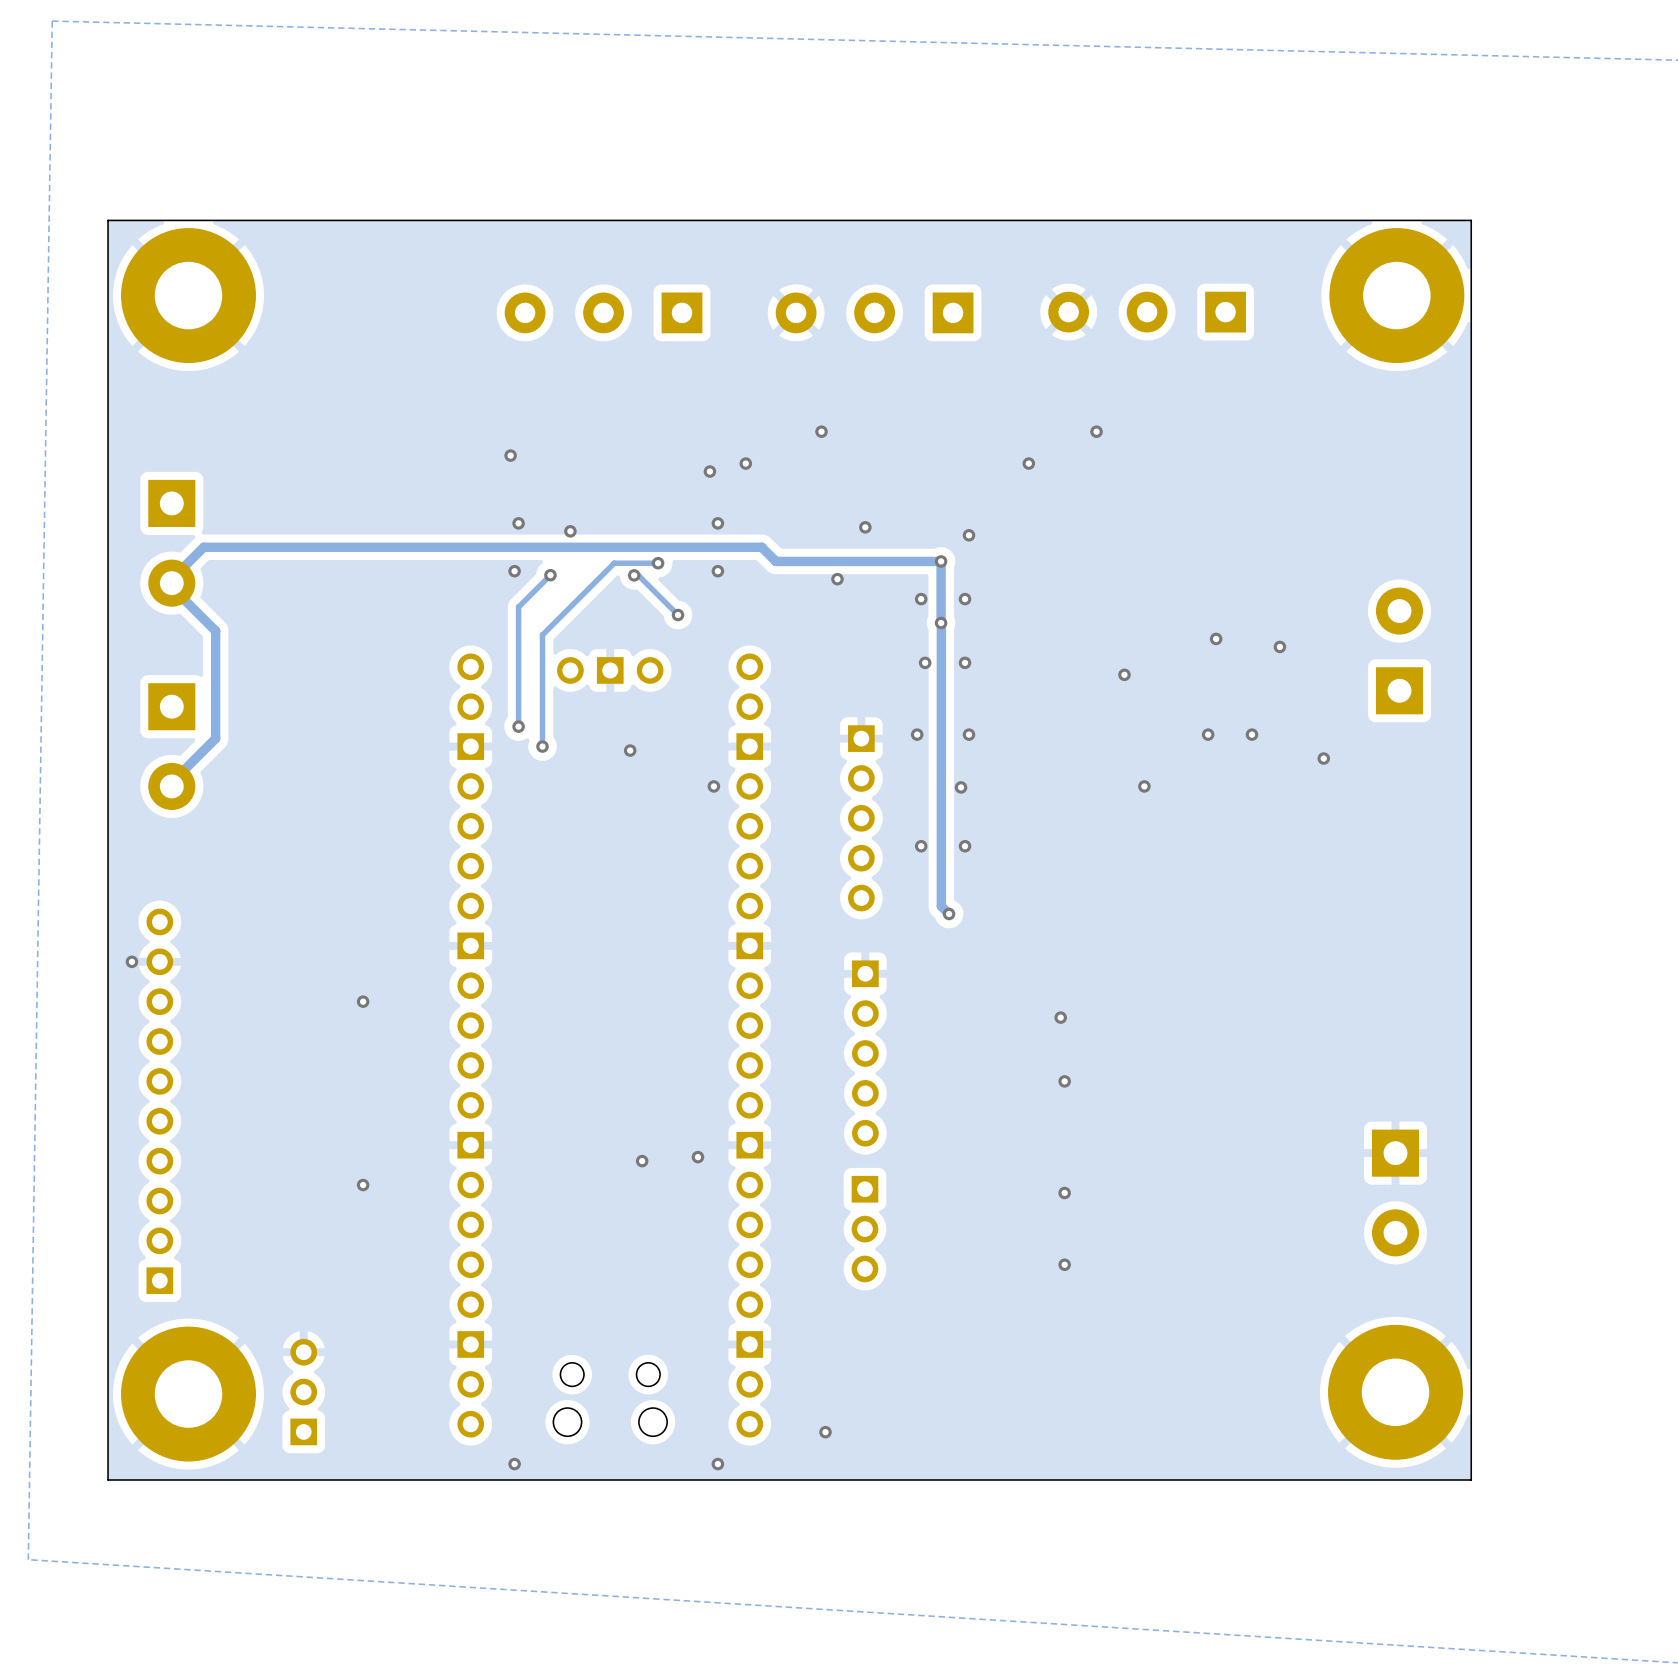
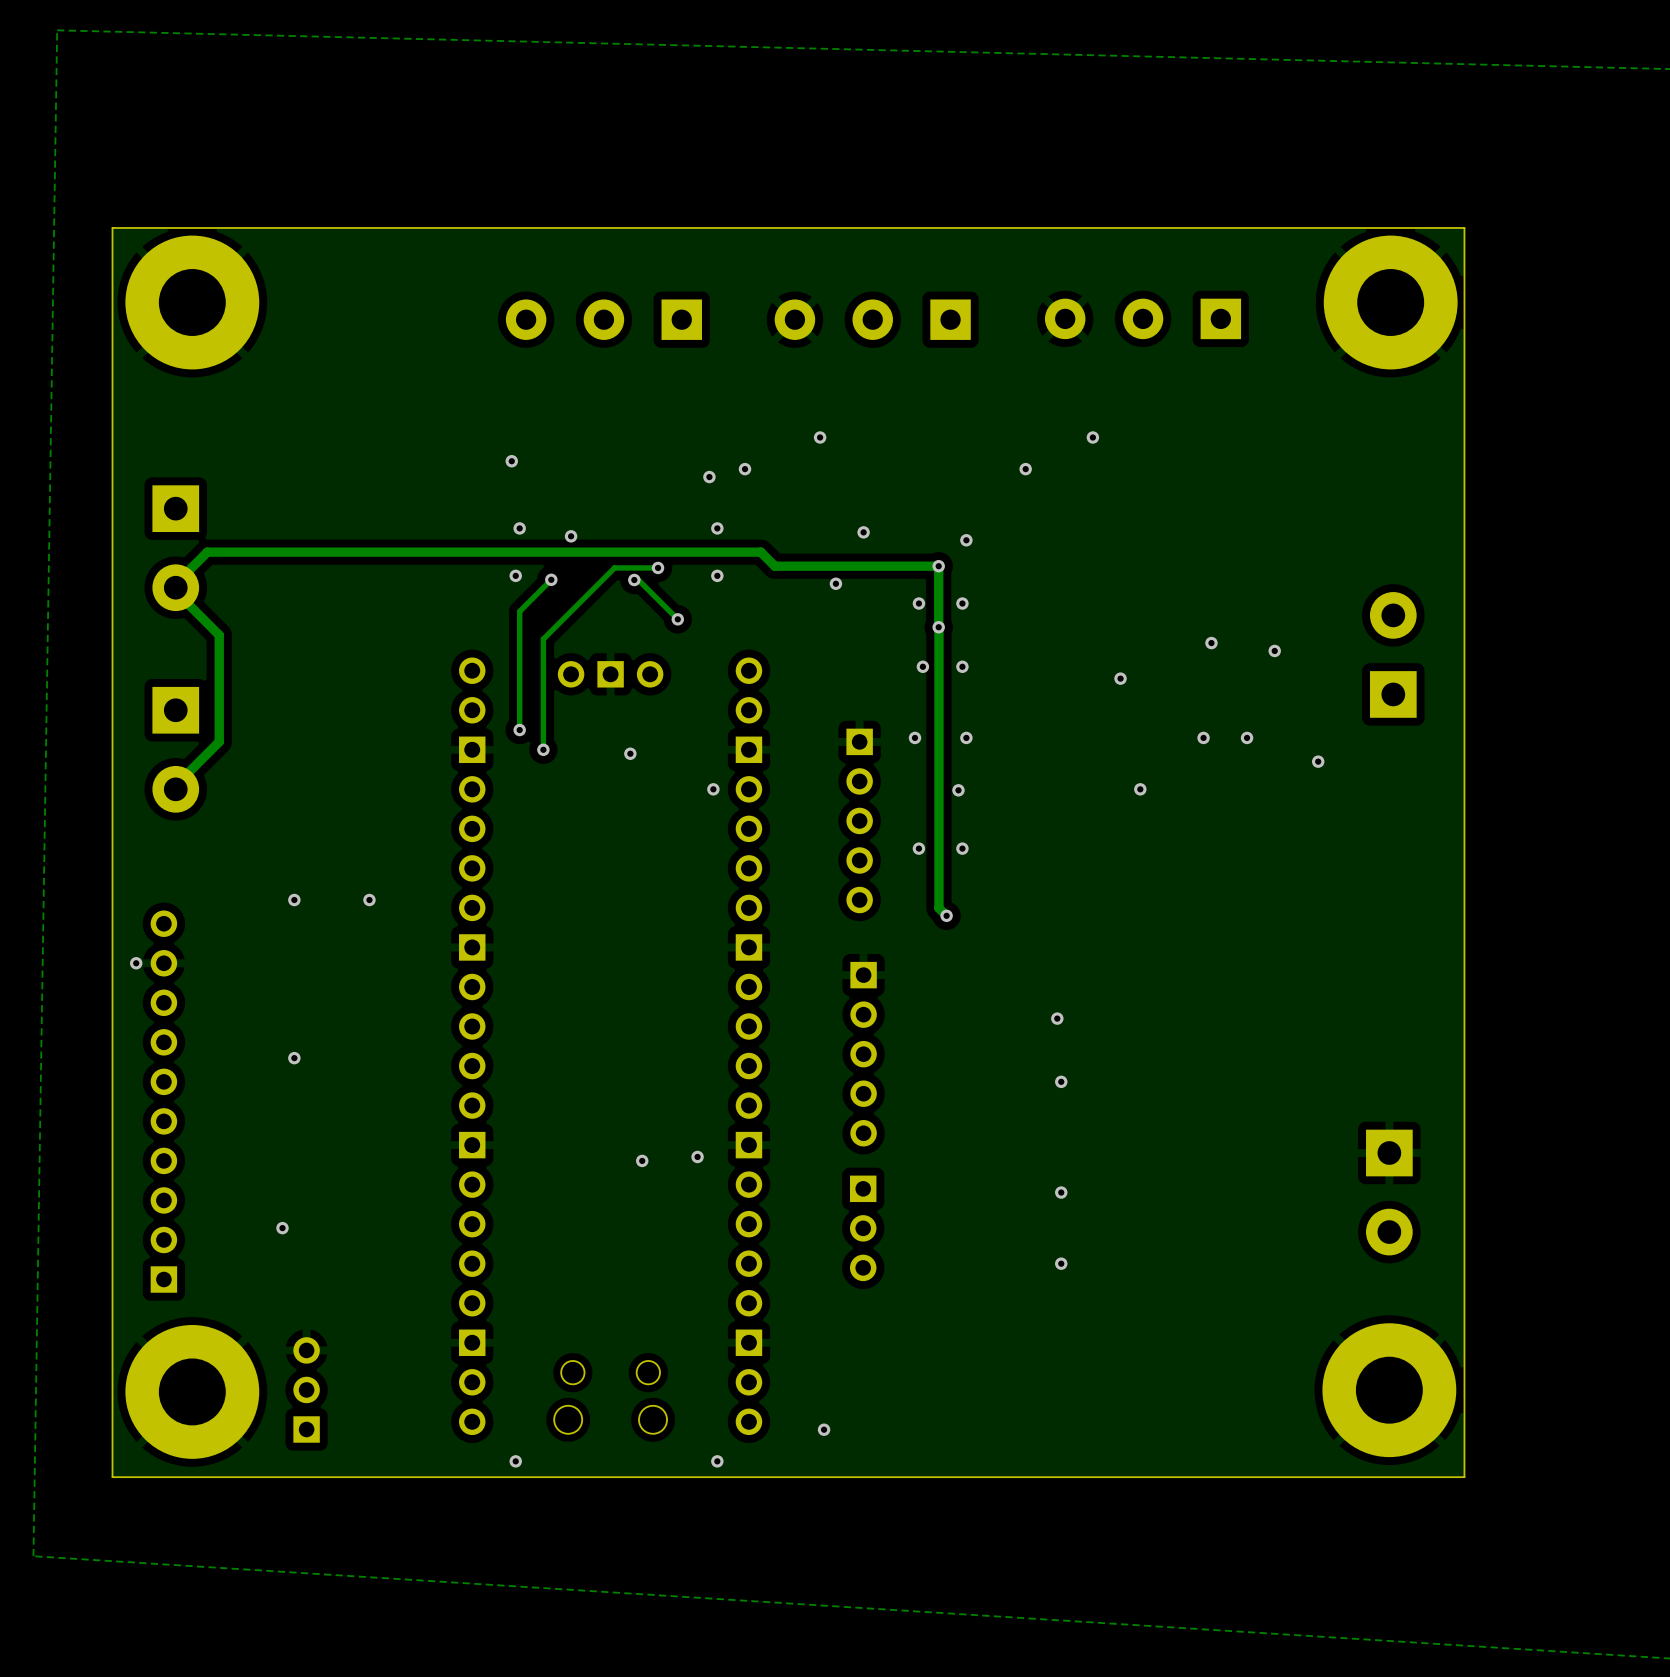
via: none -> (294, 900)
via: none -> (369, 900)
via: (363, 1001) -> none
via: none -> (294, 1058)
via: (363, 1185) -> none
via: none -> (282, 1228)

